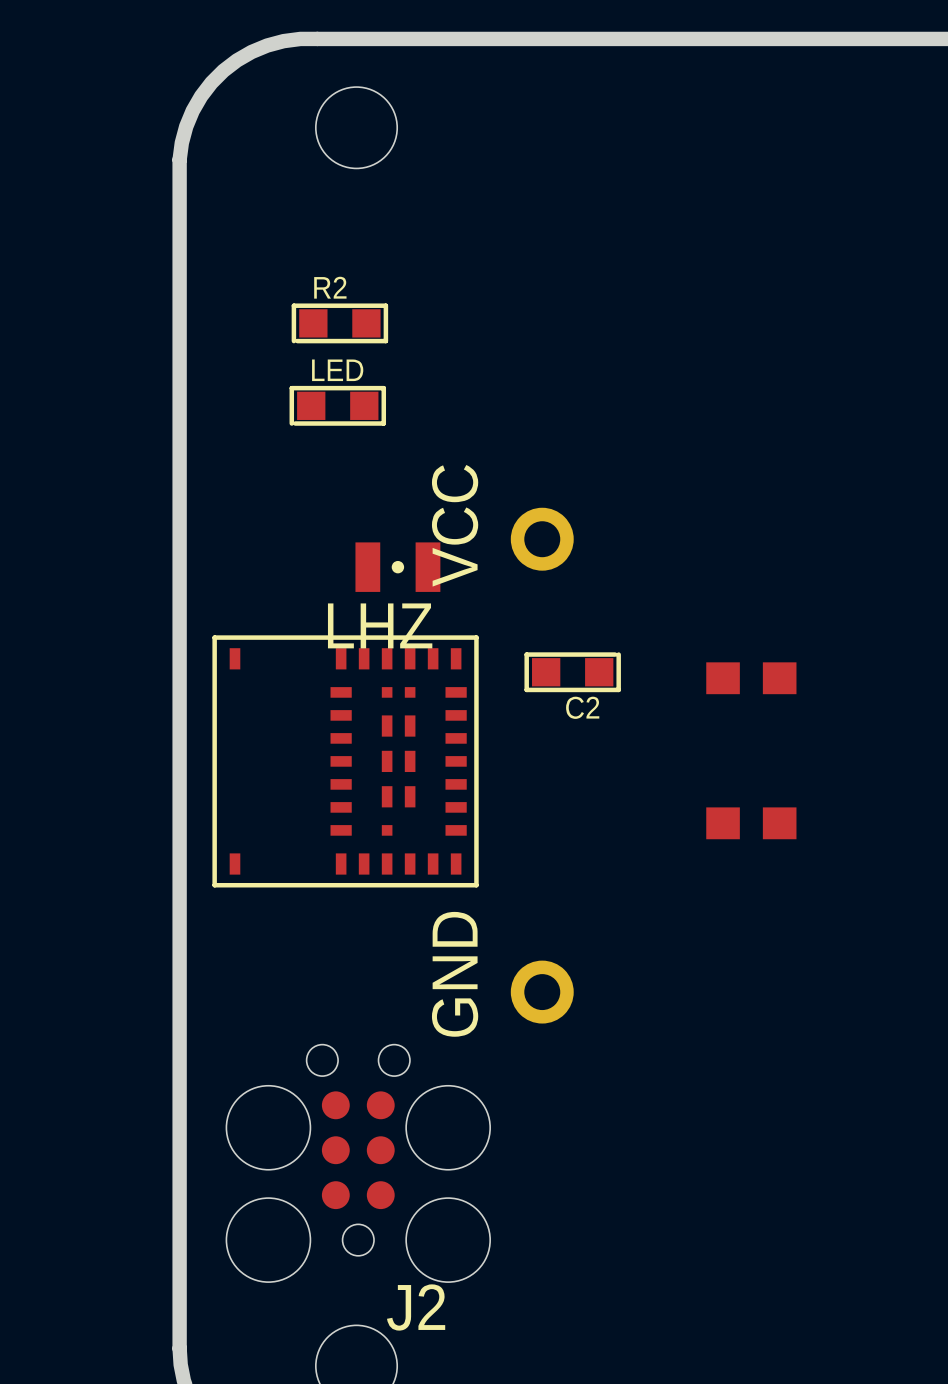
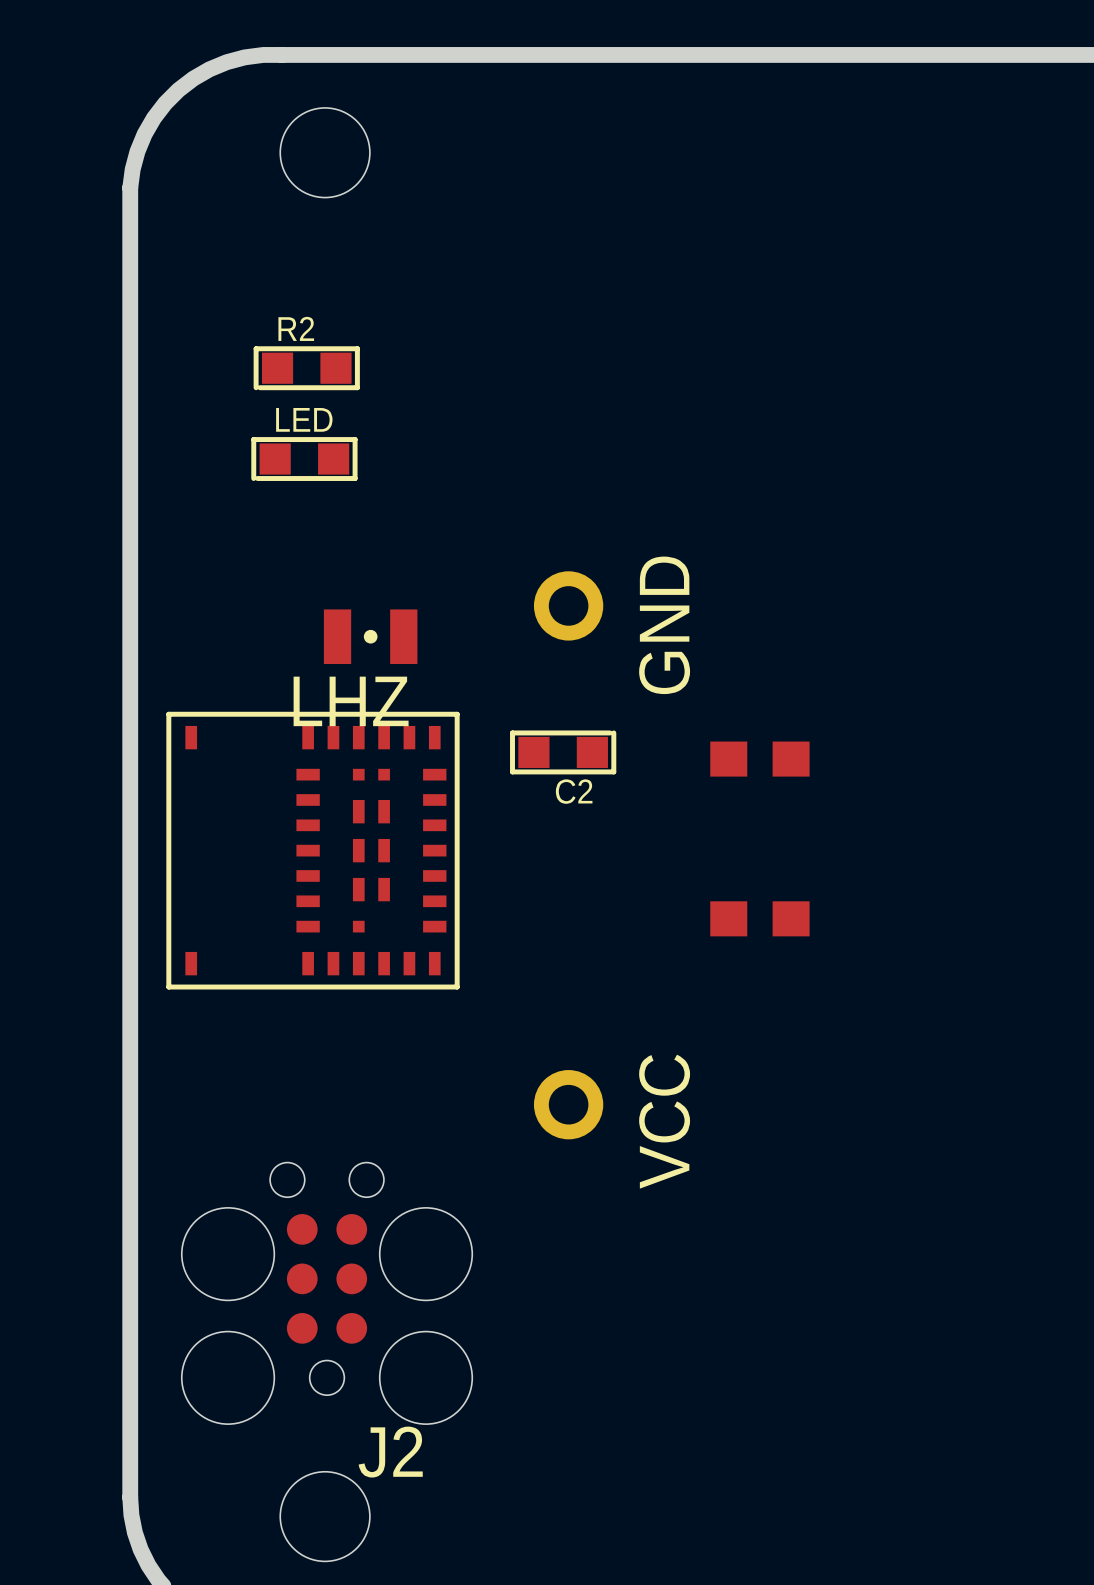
VCC name: VCC (455, 525) -> GND (664, 625)
VCC position: (542, 539) -> (568, 605)
GND name: GND (455, 974) -> VCC (664, 1121)
GND position: (542, 992) -> (568, 1104)

